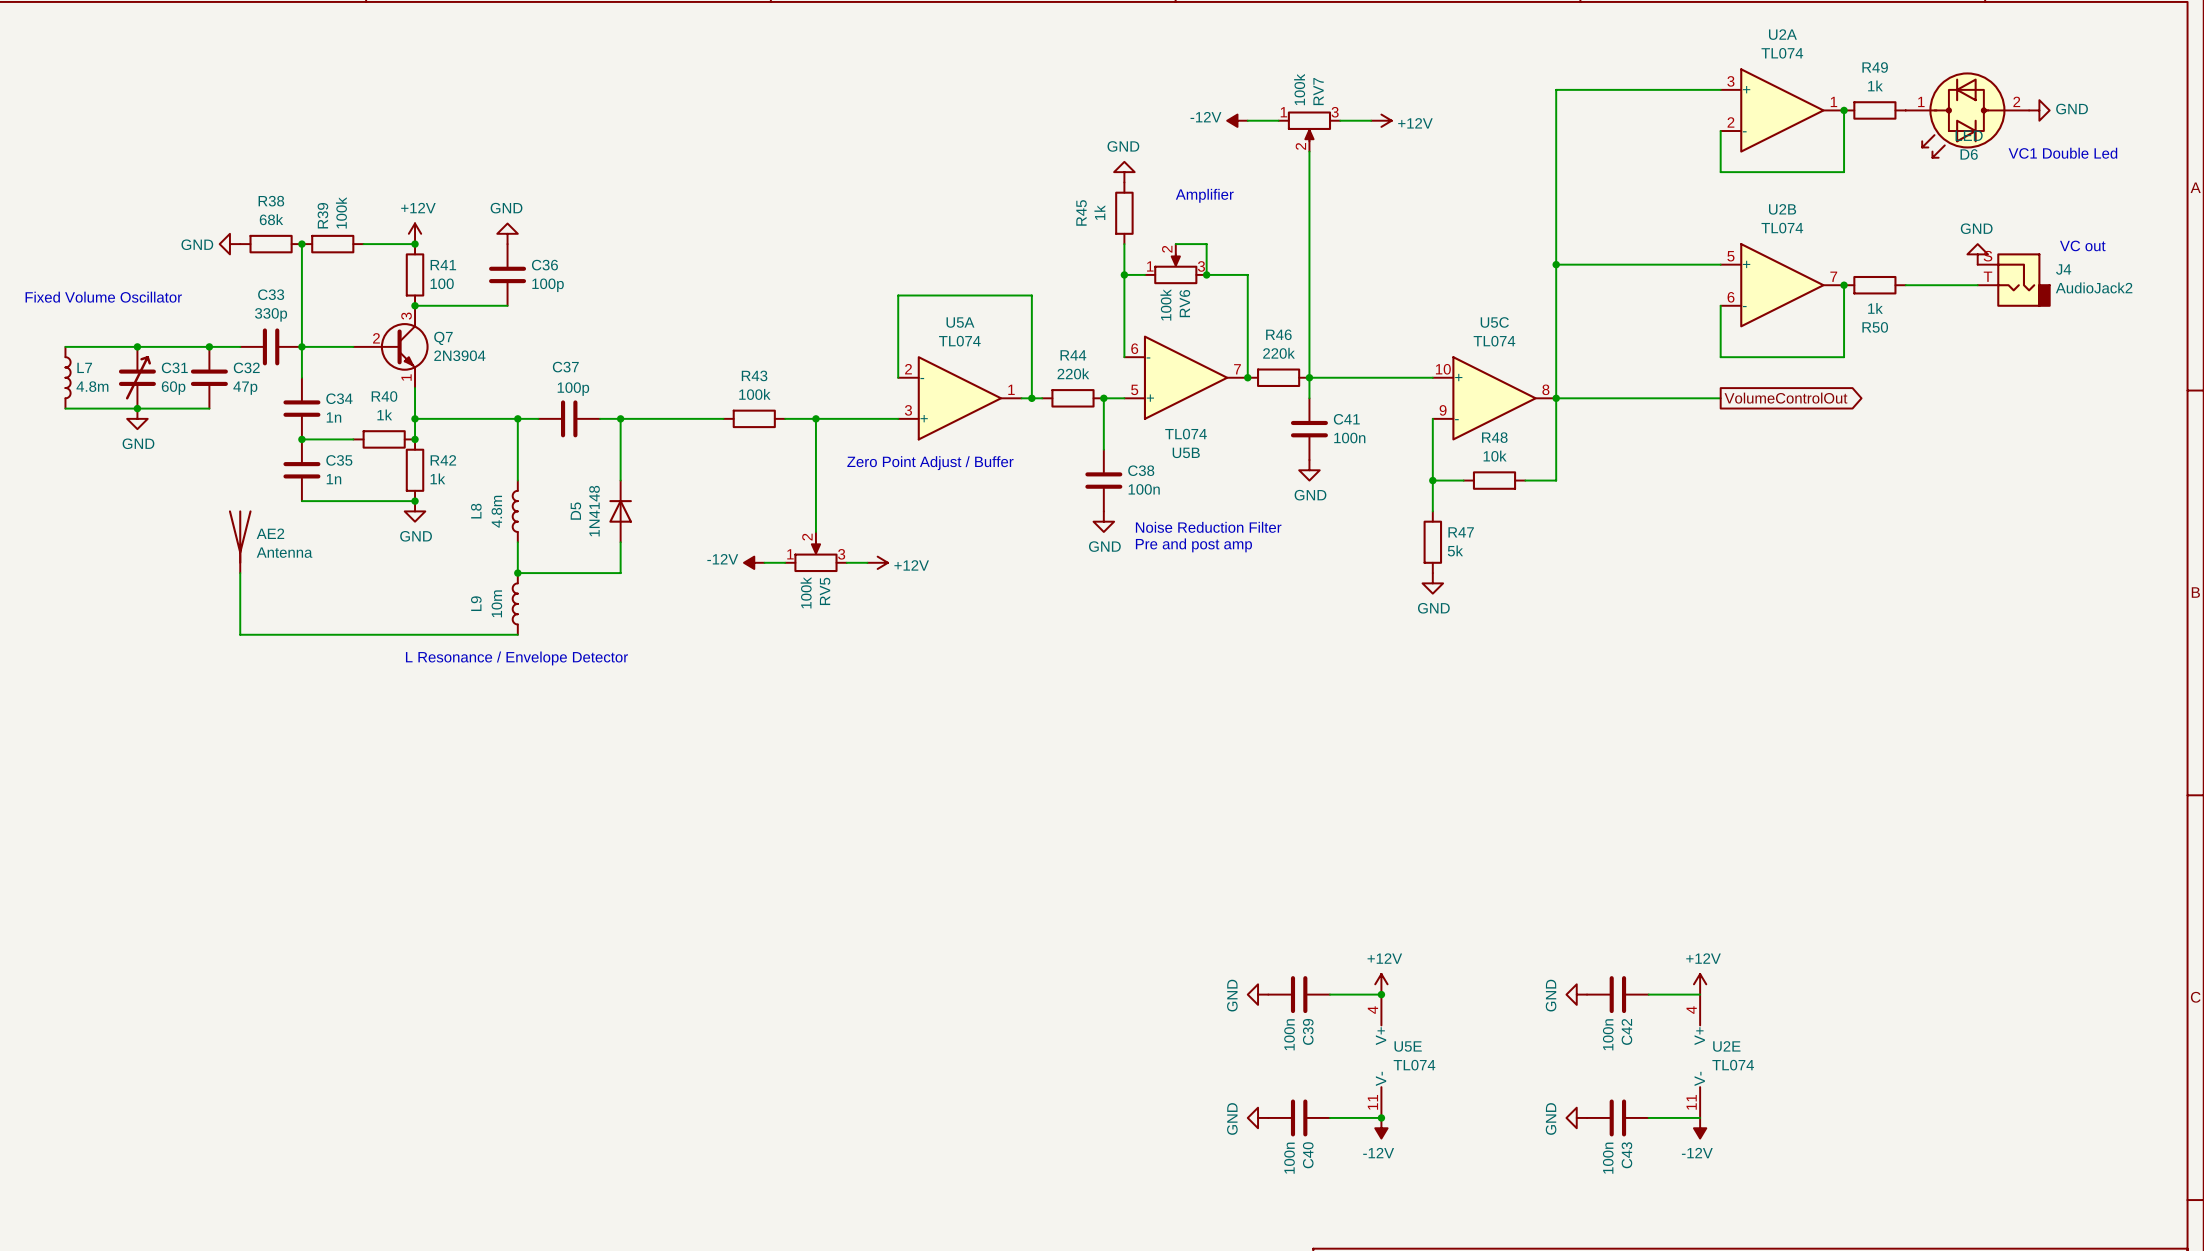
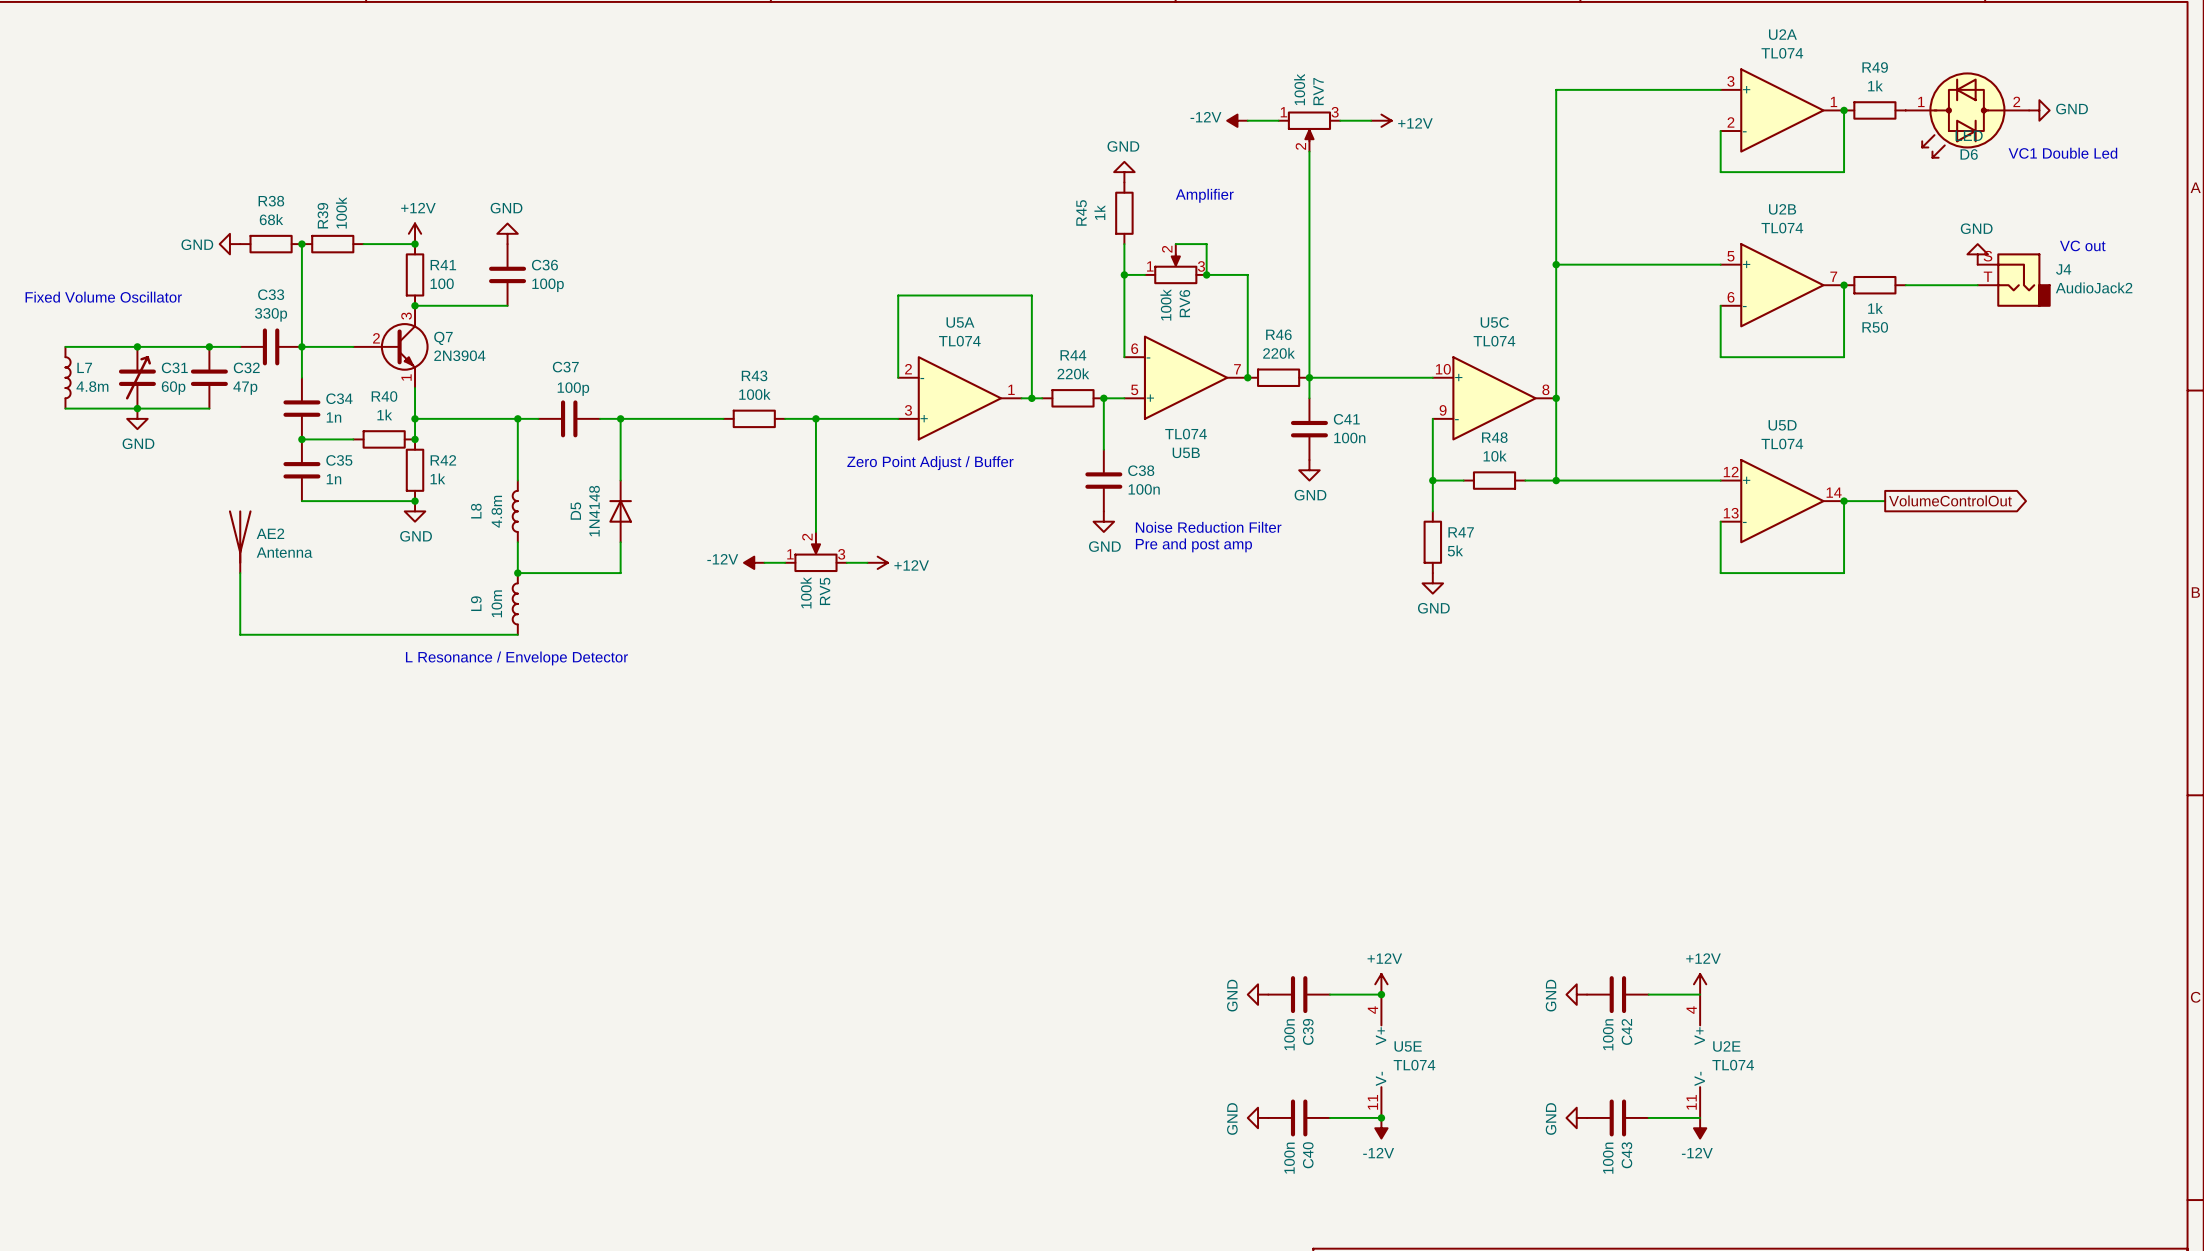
wire: (1556, 398) (1720, 398) -> (1556, 480) (1720, 480)
global label position: VolumeControlOut (1785, 398) -> VolumeControlOut (1950, 500)
junction: none -> (1556, 480)
U5D: none -> TL074 (1782, 501)
junction: none -> (1844, 501)
wire: none -> (1885, 501) (1844, 501) (1844, 573) (1720, 573) (1720, 521)

